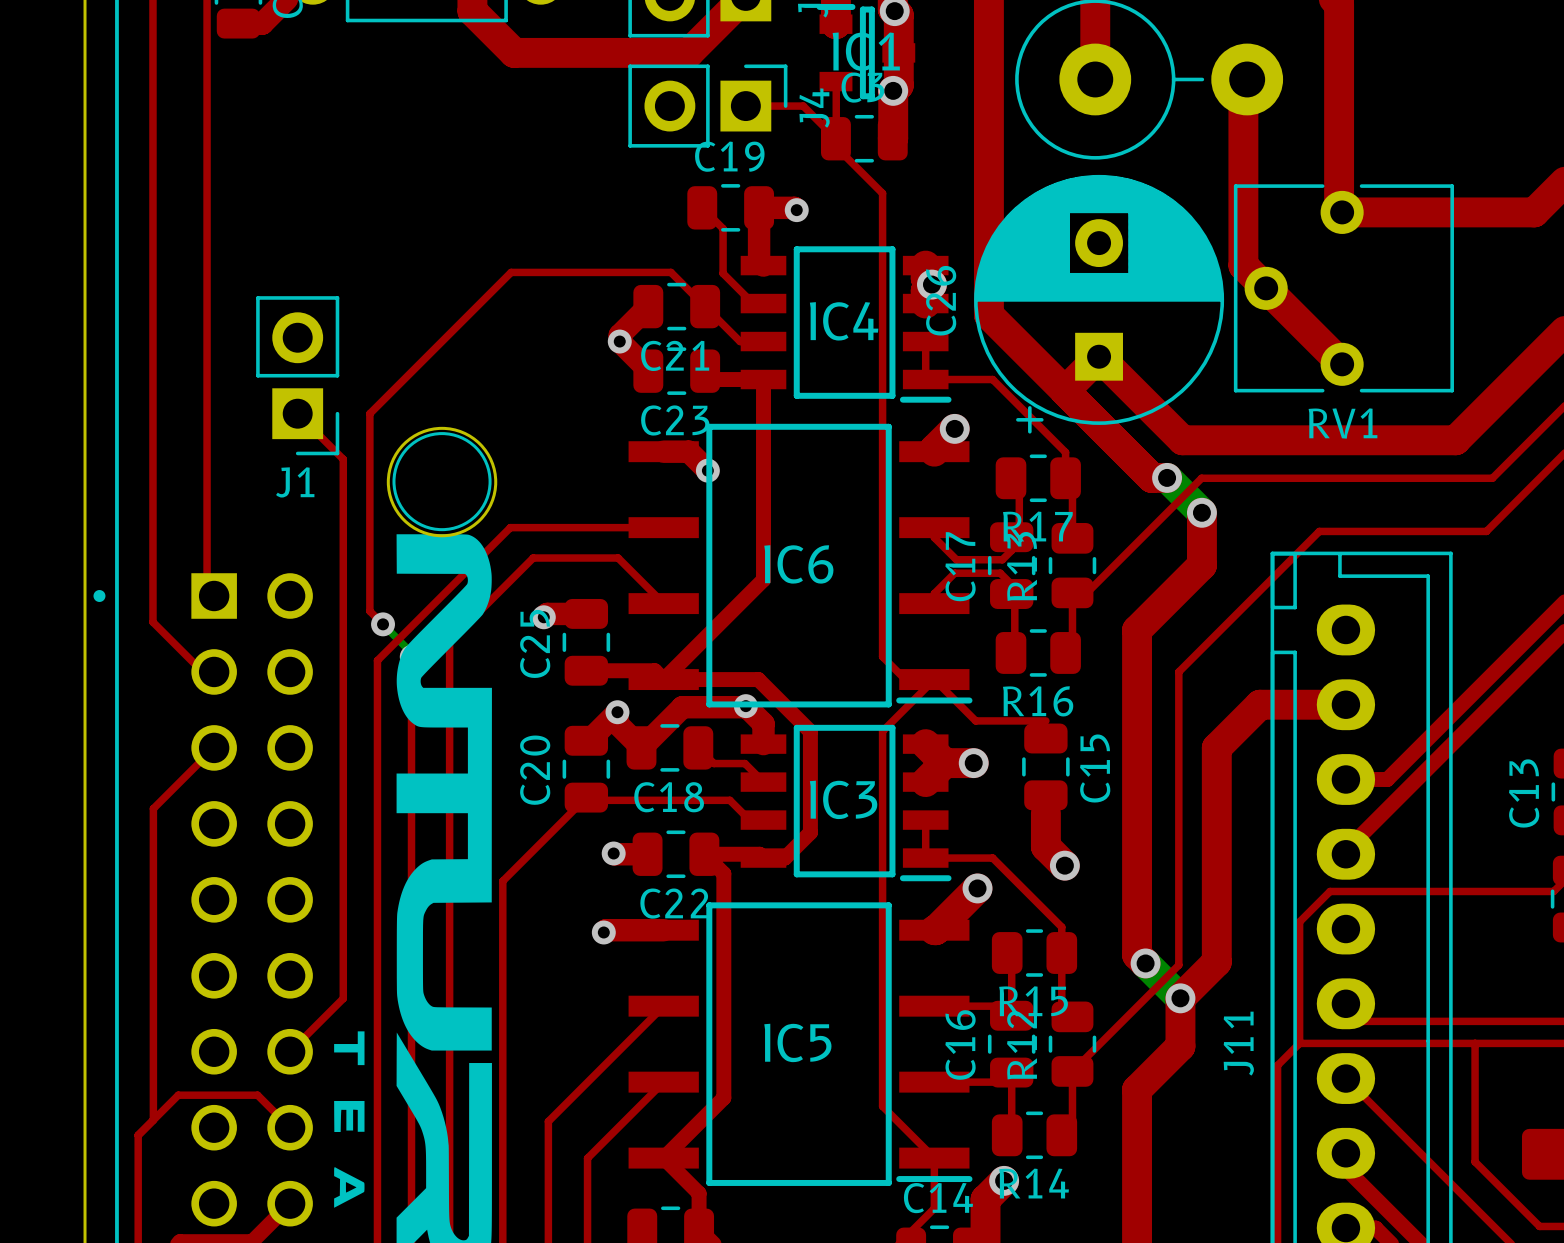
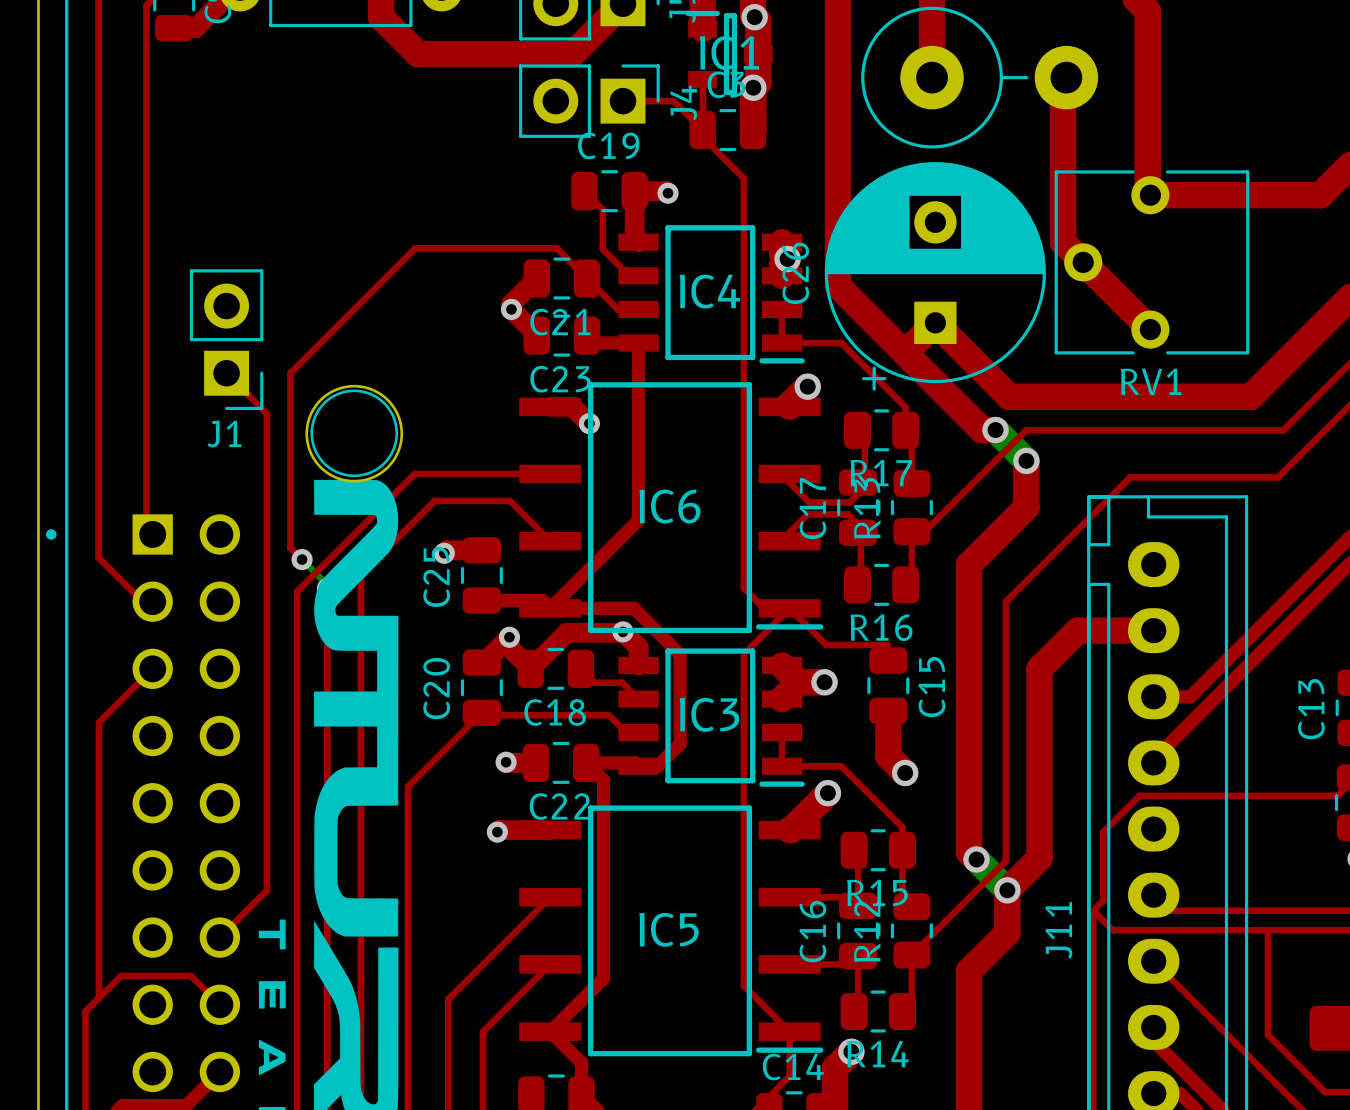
top track: (1299, 921) (1299, 1043) (1277, 1065) -> (1112, 822) (1103, 832) (1103, 900) (1093, 910)
top track: none -> (1093, 910) (1093, 949)
top track: none -> (1093, 910) (1112, 930)

